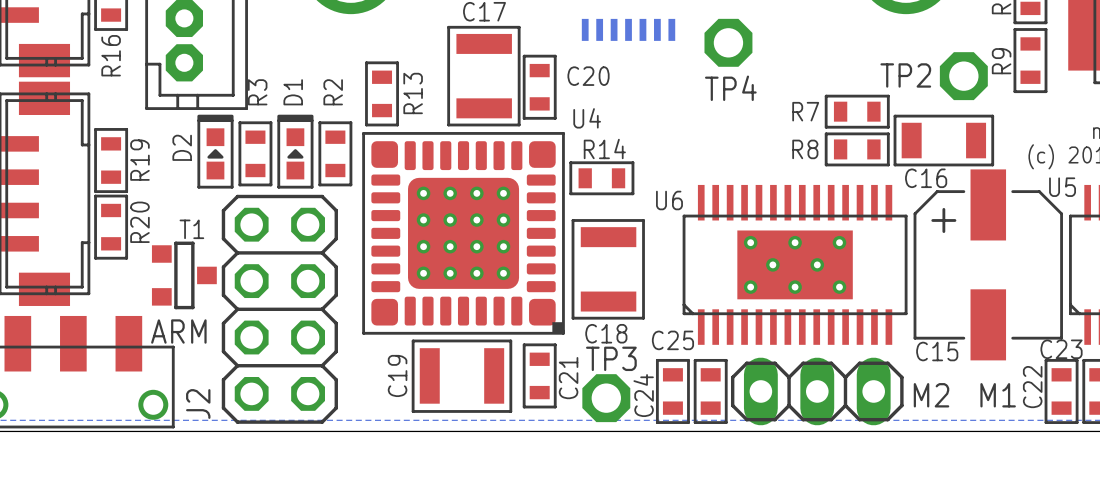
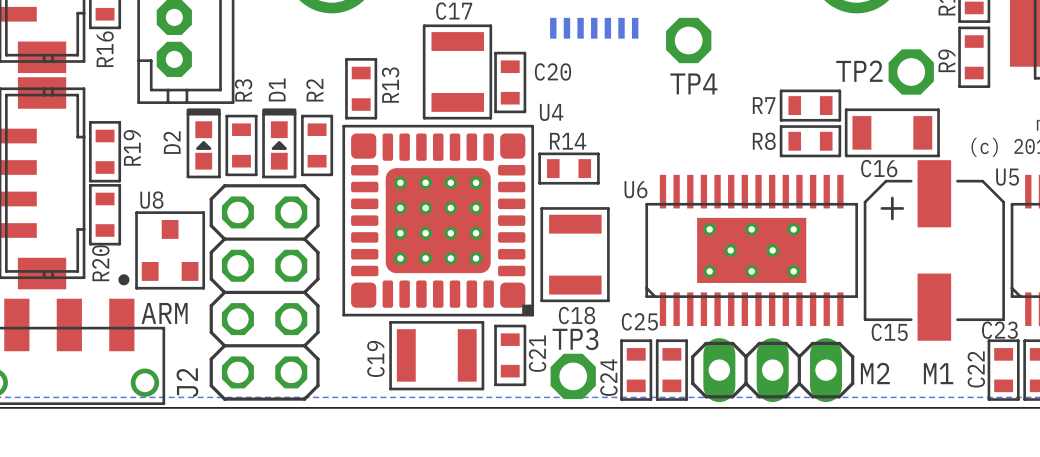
R20 name position: R20 (139, 222) -> R20 (100, 263)
U8: none -> (161, 250)
T1: (184, 275) -> none

